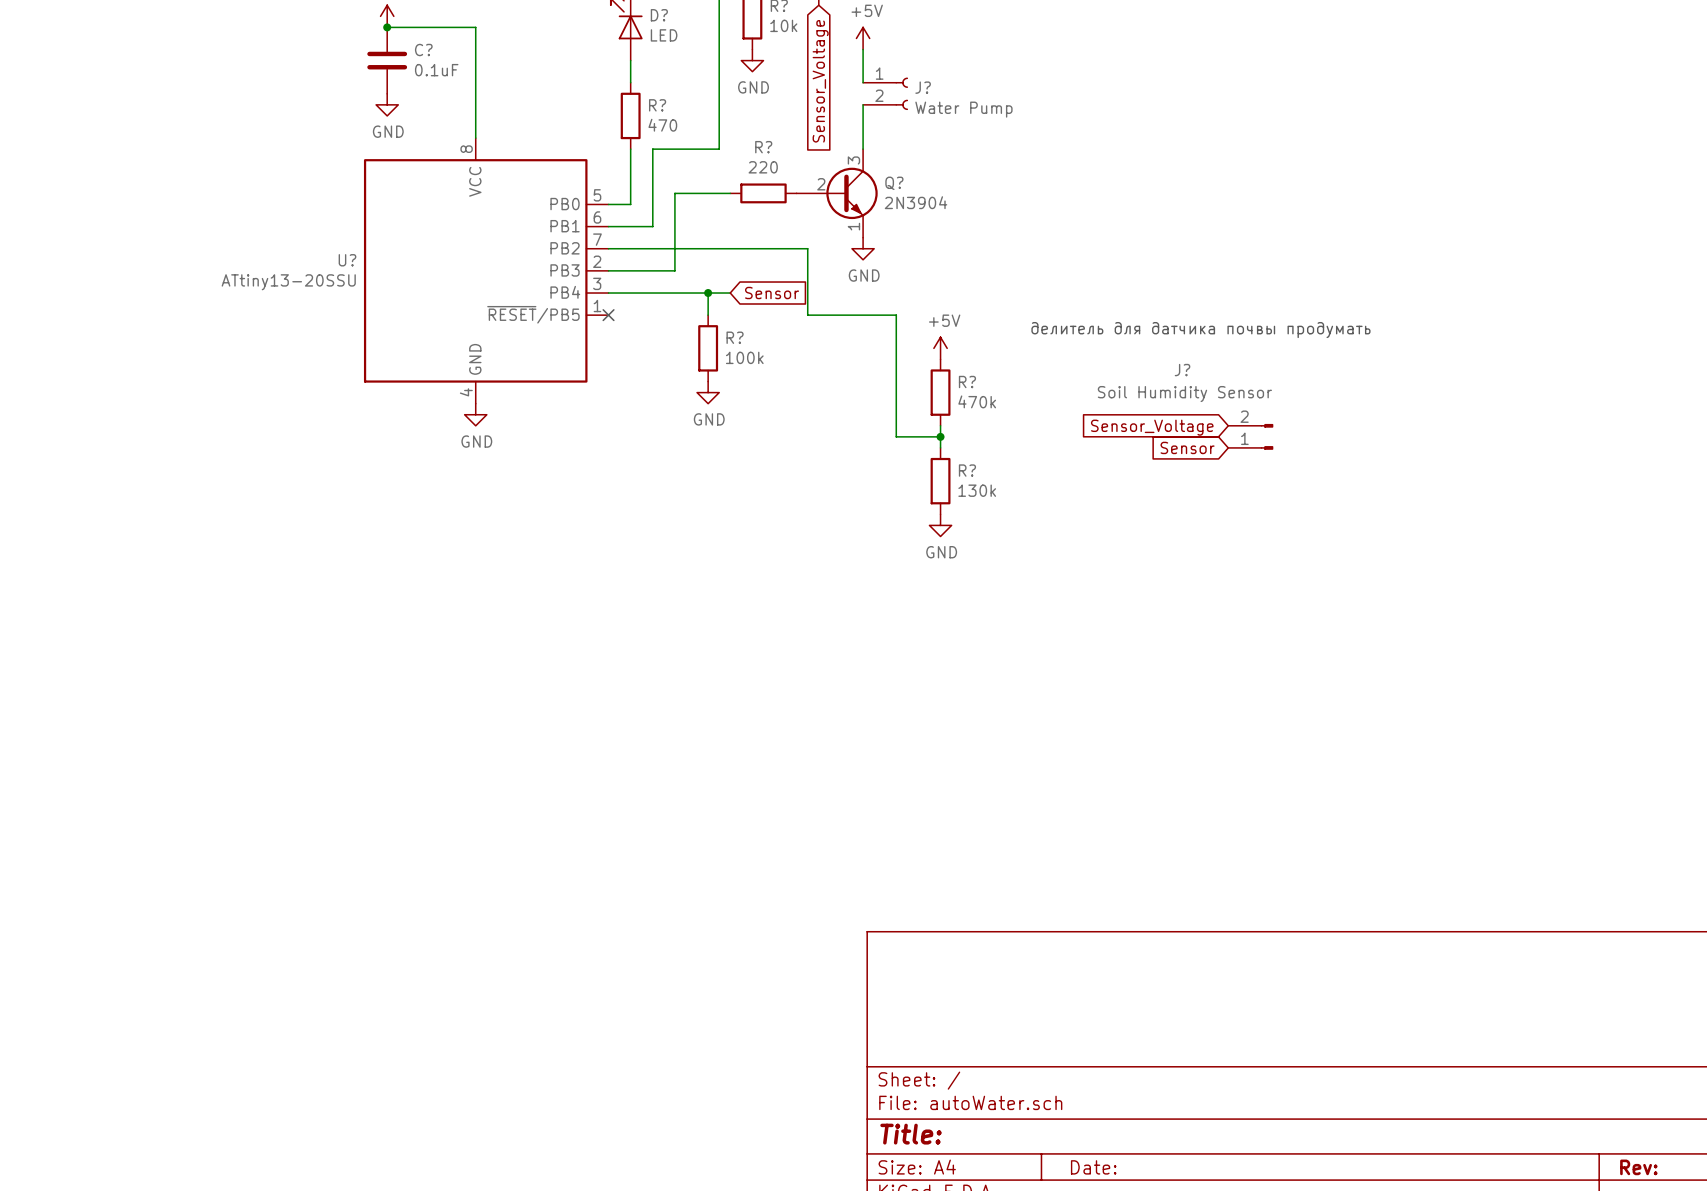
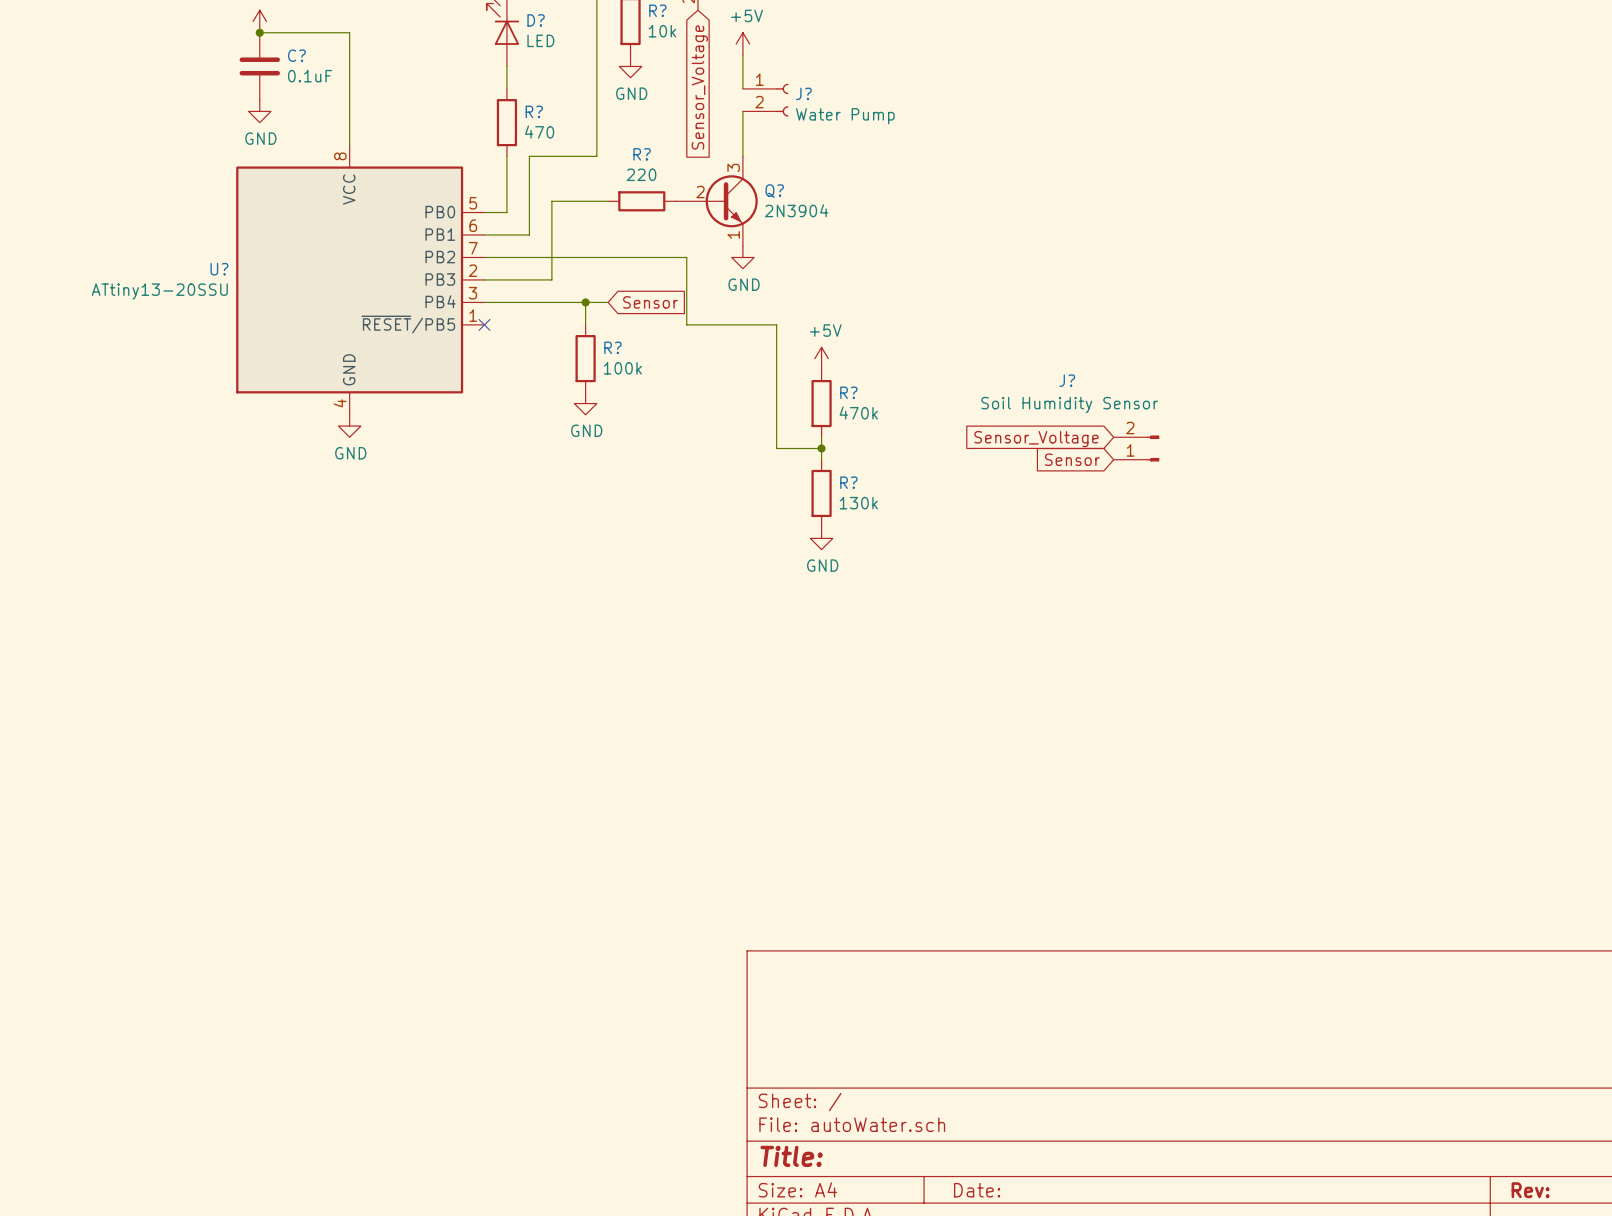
text: делитель для датчика почвы продумать (1200, 330) -> none

